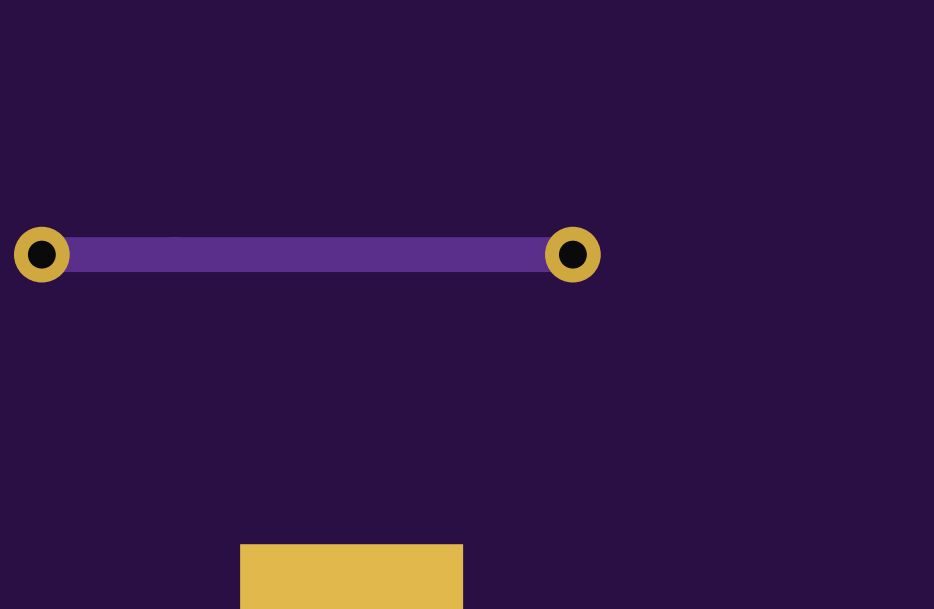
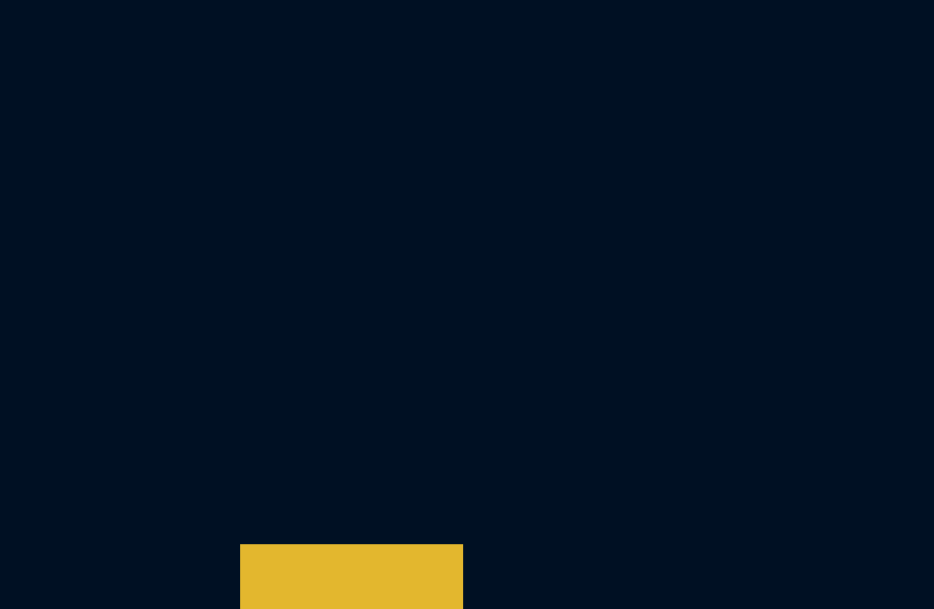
via: (41, 254) -> none
track: (572, 254) (41, 254) -> none
via: (572, 254) -> none

